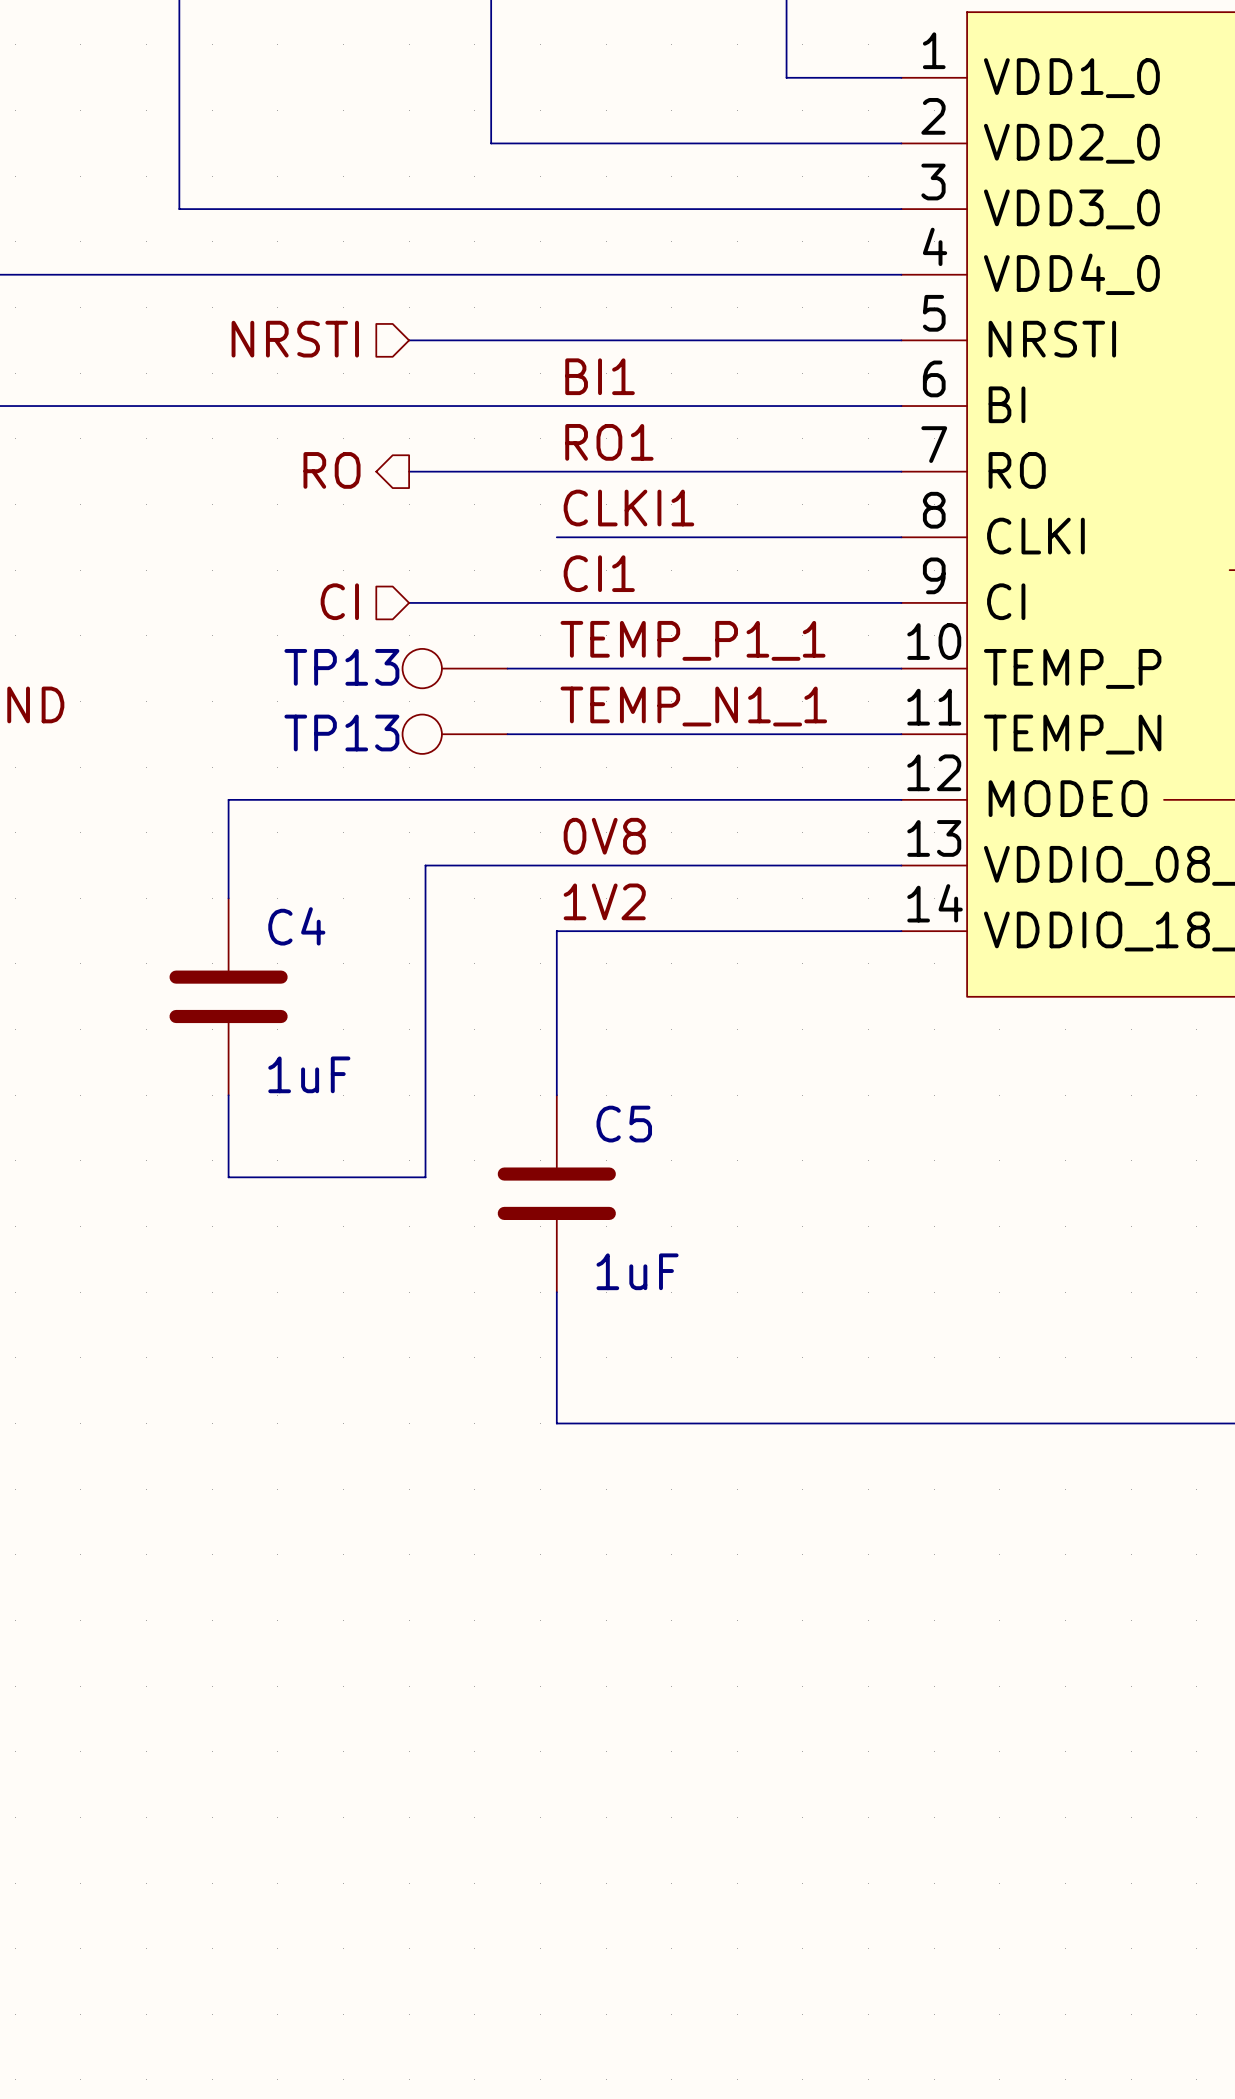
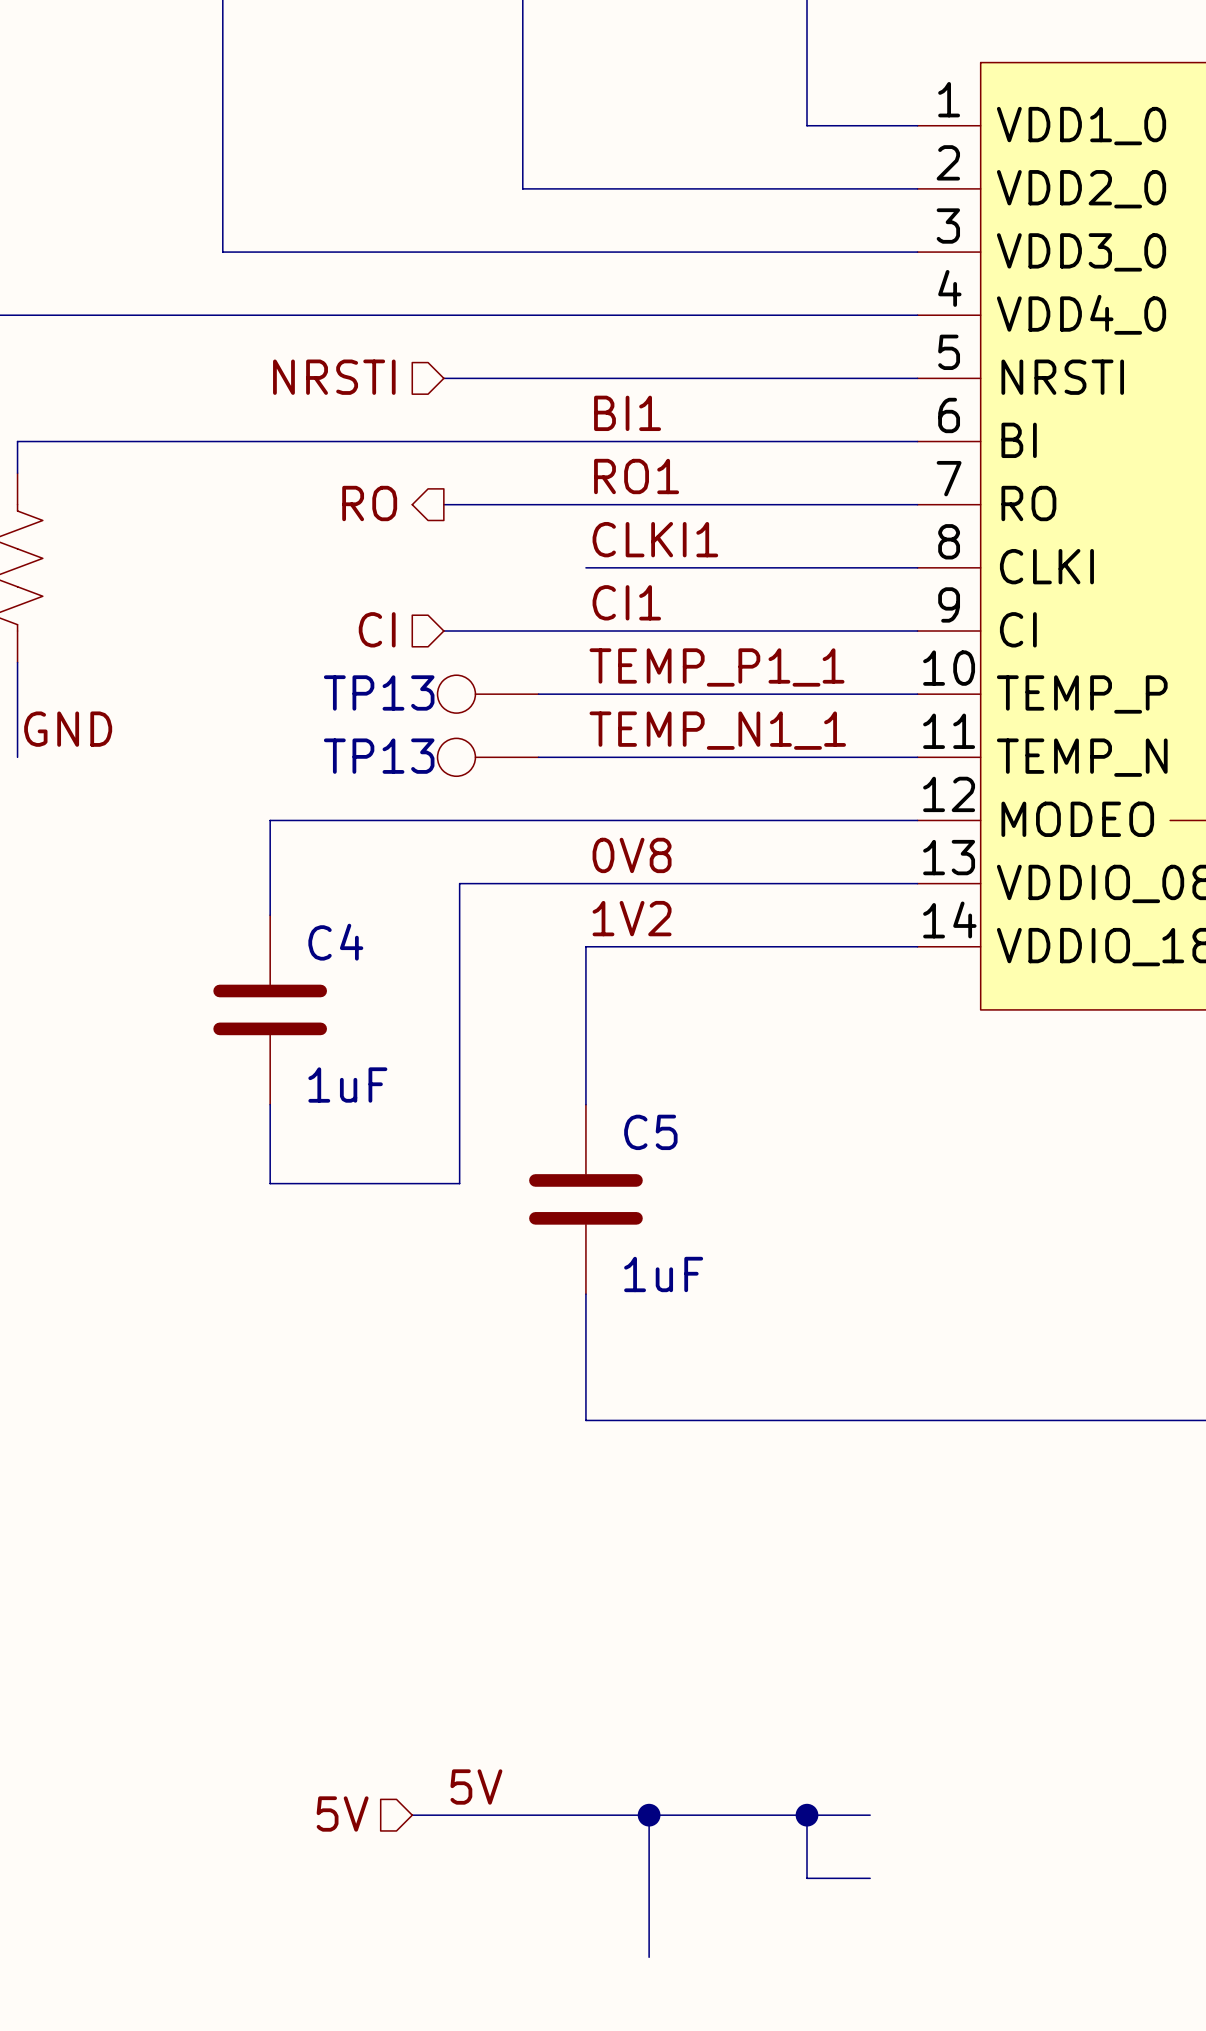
label: none -> 5V (476, 1787)
hierarchical label: none -> 5V (342, 1814)
wire: none -> (412, 1815) (870, 1815)
wire: none -> (649, 1815) (649, 1957)
junction: none -> (649, 1815)
wire: none -> (807, 1815) (807, 1878) (870, 1878)
junction: none -> (807, 1815)

